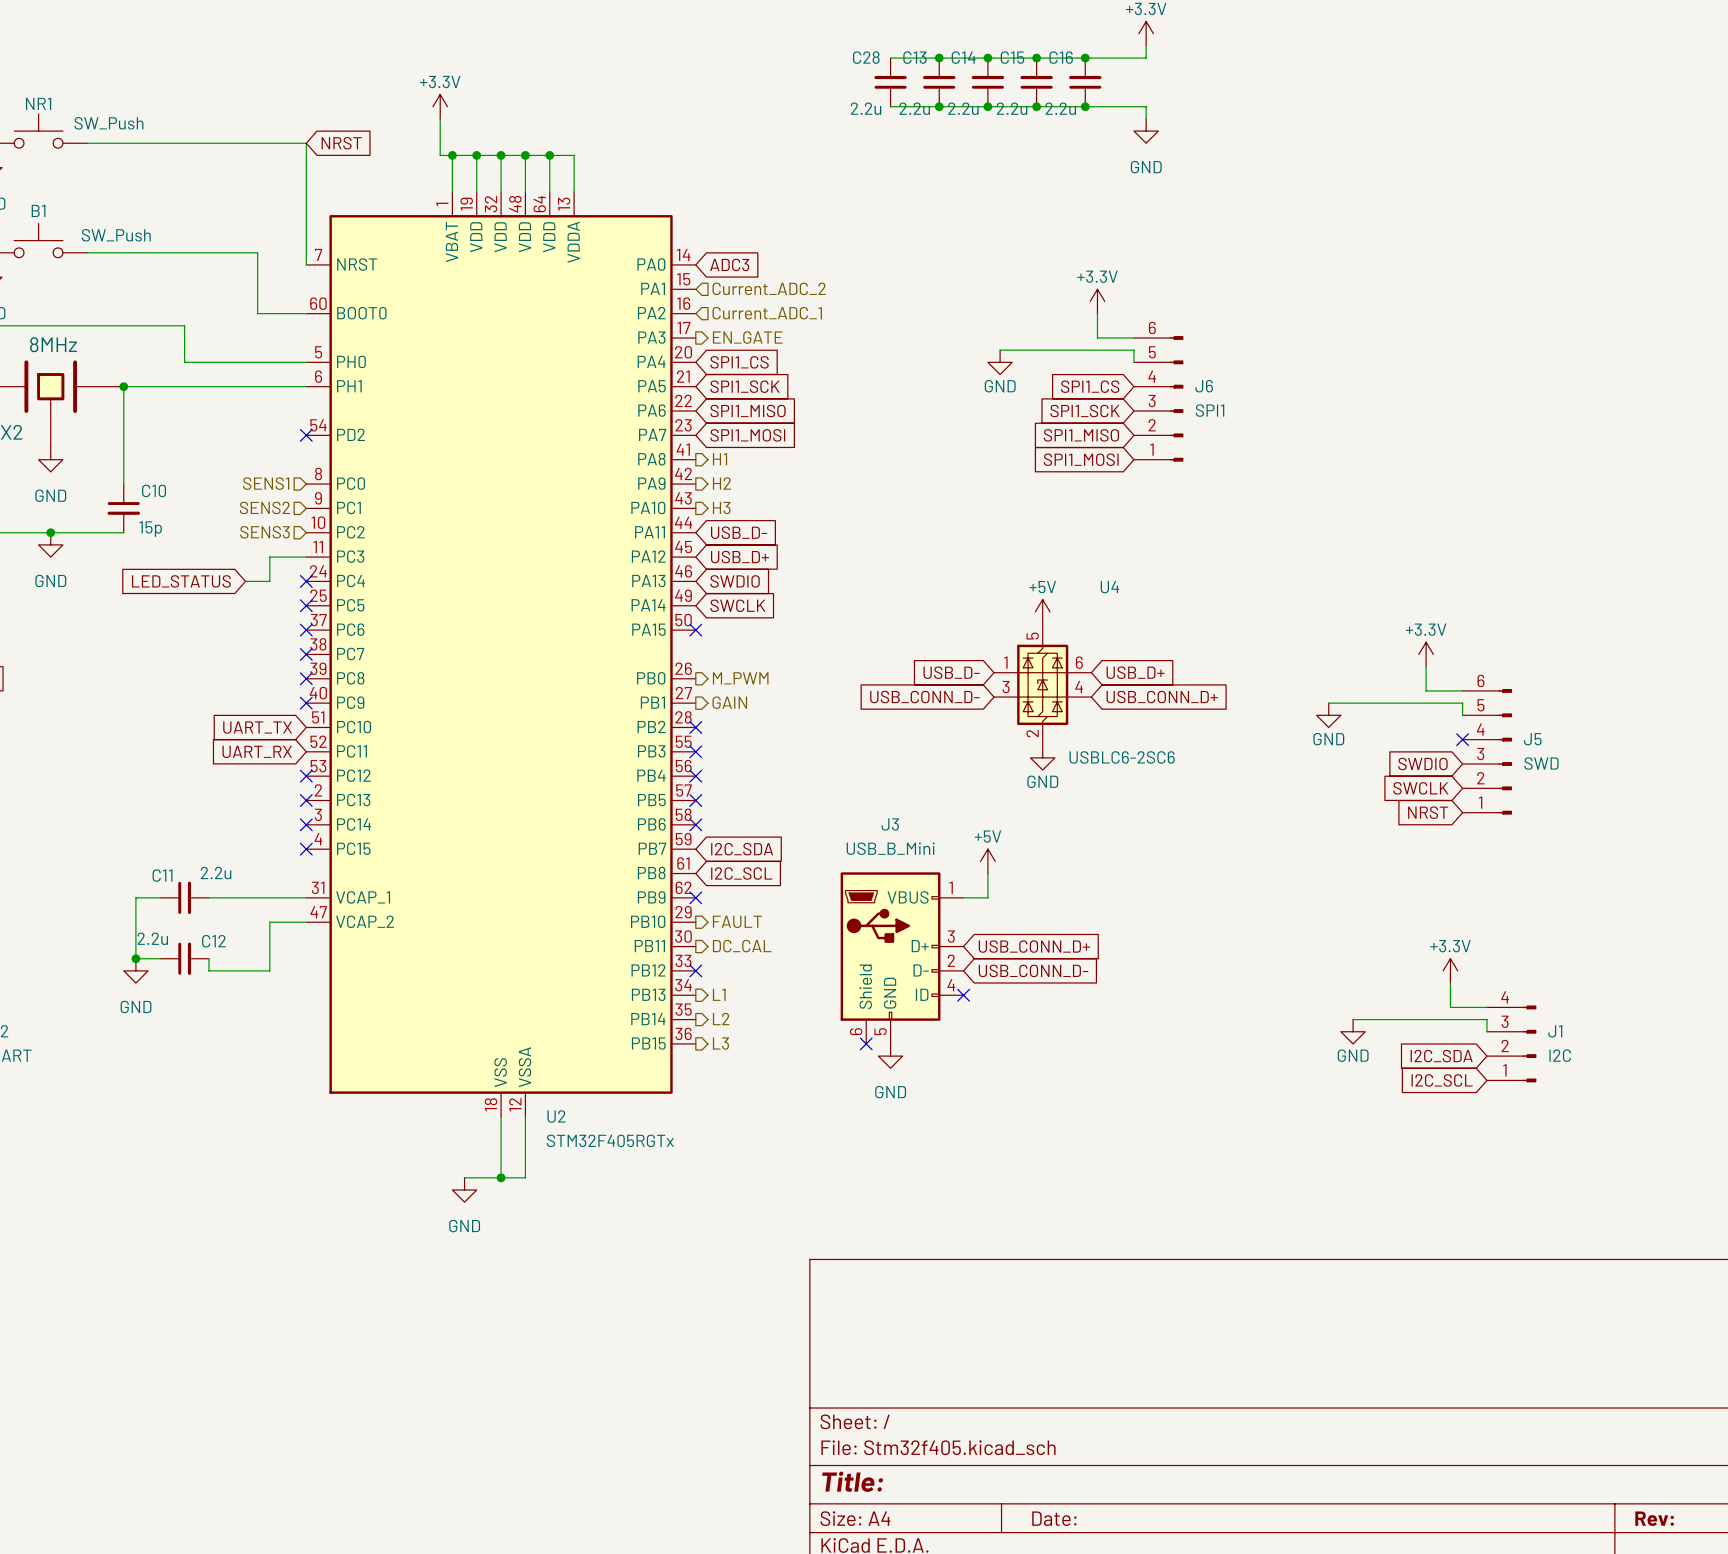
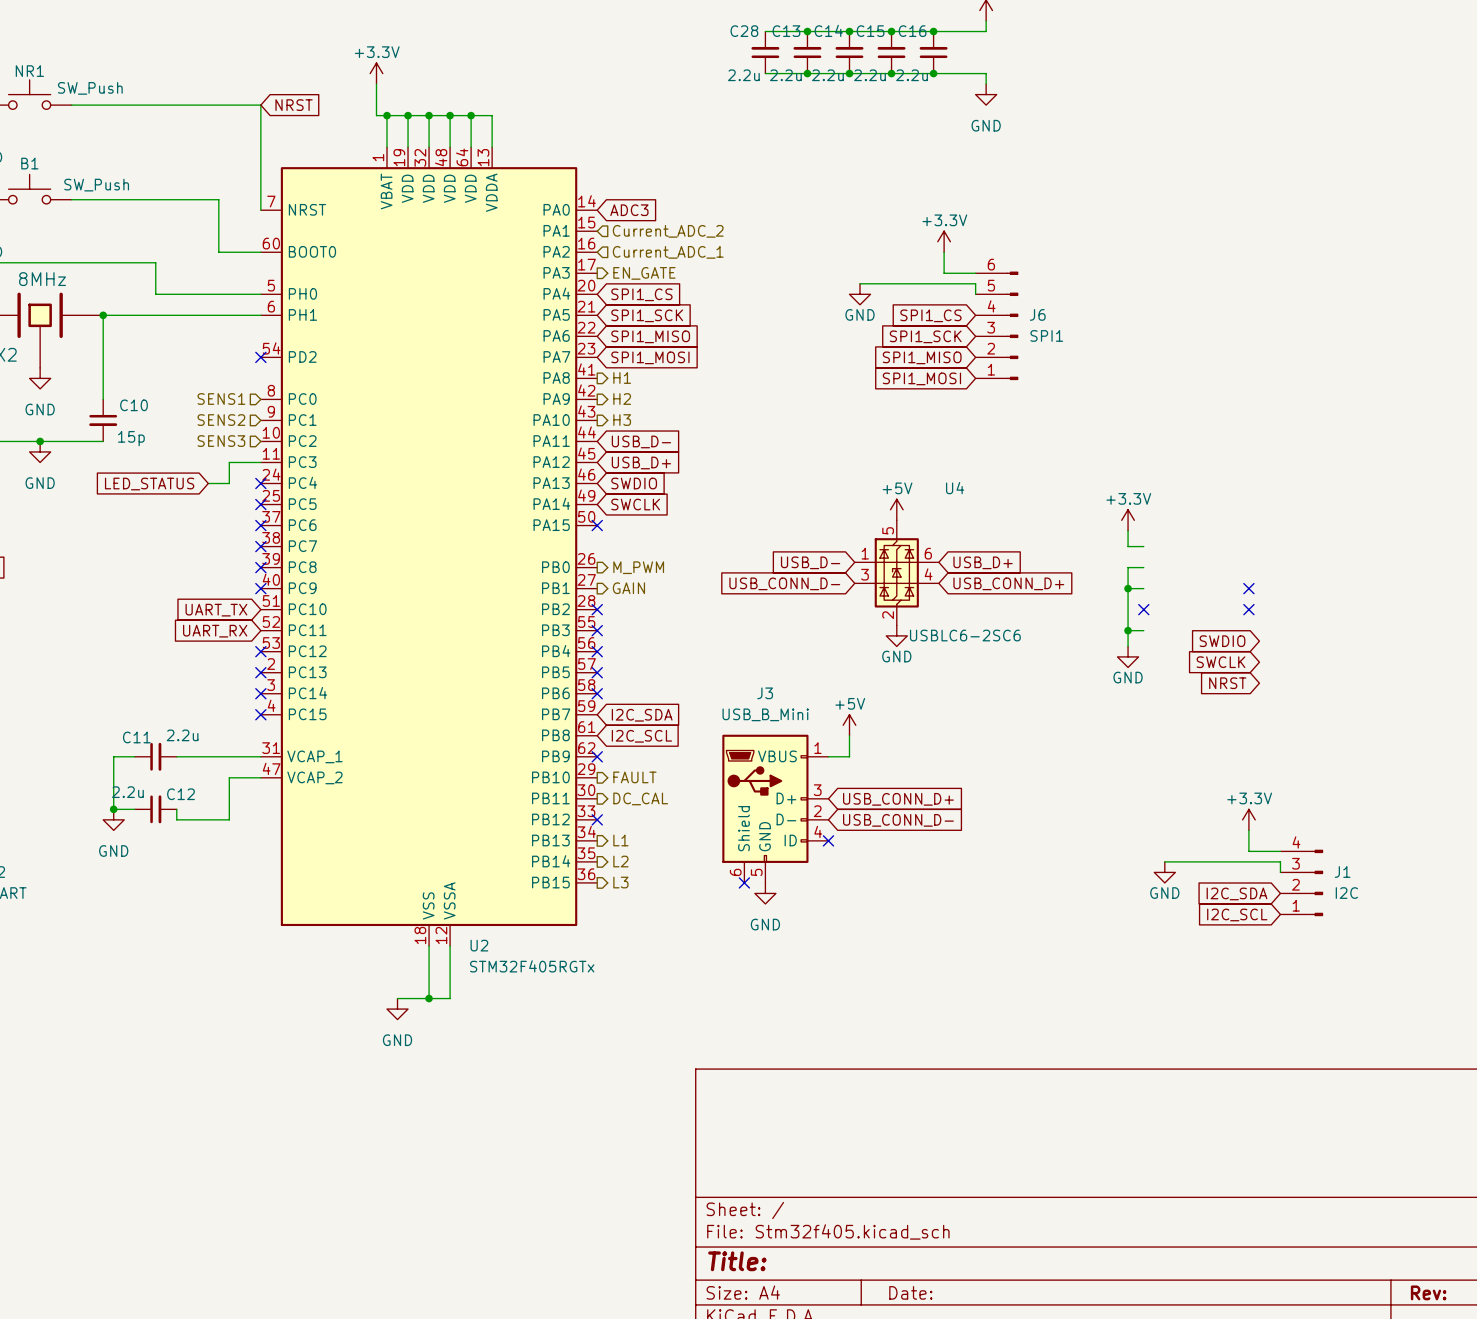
wire: none -> (1128, 530) (1128, 546) (1143, 546)
power symbol position: +3.3V (1426, 654) -> +3.3V (1128, 520)
wire: (1426, 666) (1426, 690) (1462, 690) -> none
wire: none -> (1143, 567) (1128, 567) (1128, 646)
junction: none -> (1128, 588)
wire: (1328, 703) (1462, 703) (1462, 715) -> (1143, 588) (1128, 588)
no-connect mark: none -> (1248, 588)
power symbol position: GND (1328, 715) -> GND (1128, 656)
no-connect mark: none -> (1143, 609)
no-connect mark position: (1462, 739) -> (1248, 609)
wire: none -> (1128, 630) (1143, 630)
junction: none -> (1128, 630)
J5: SWD (1487, 751) -> none

